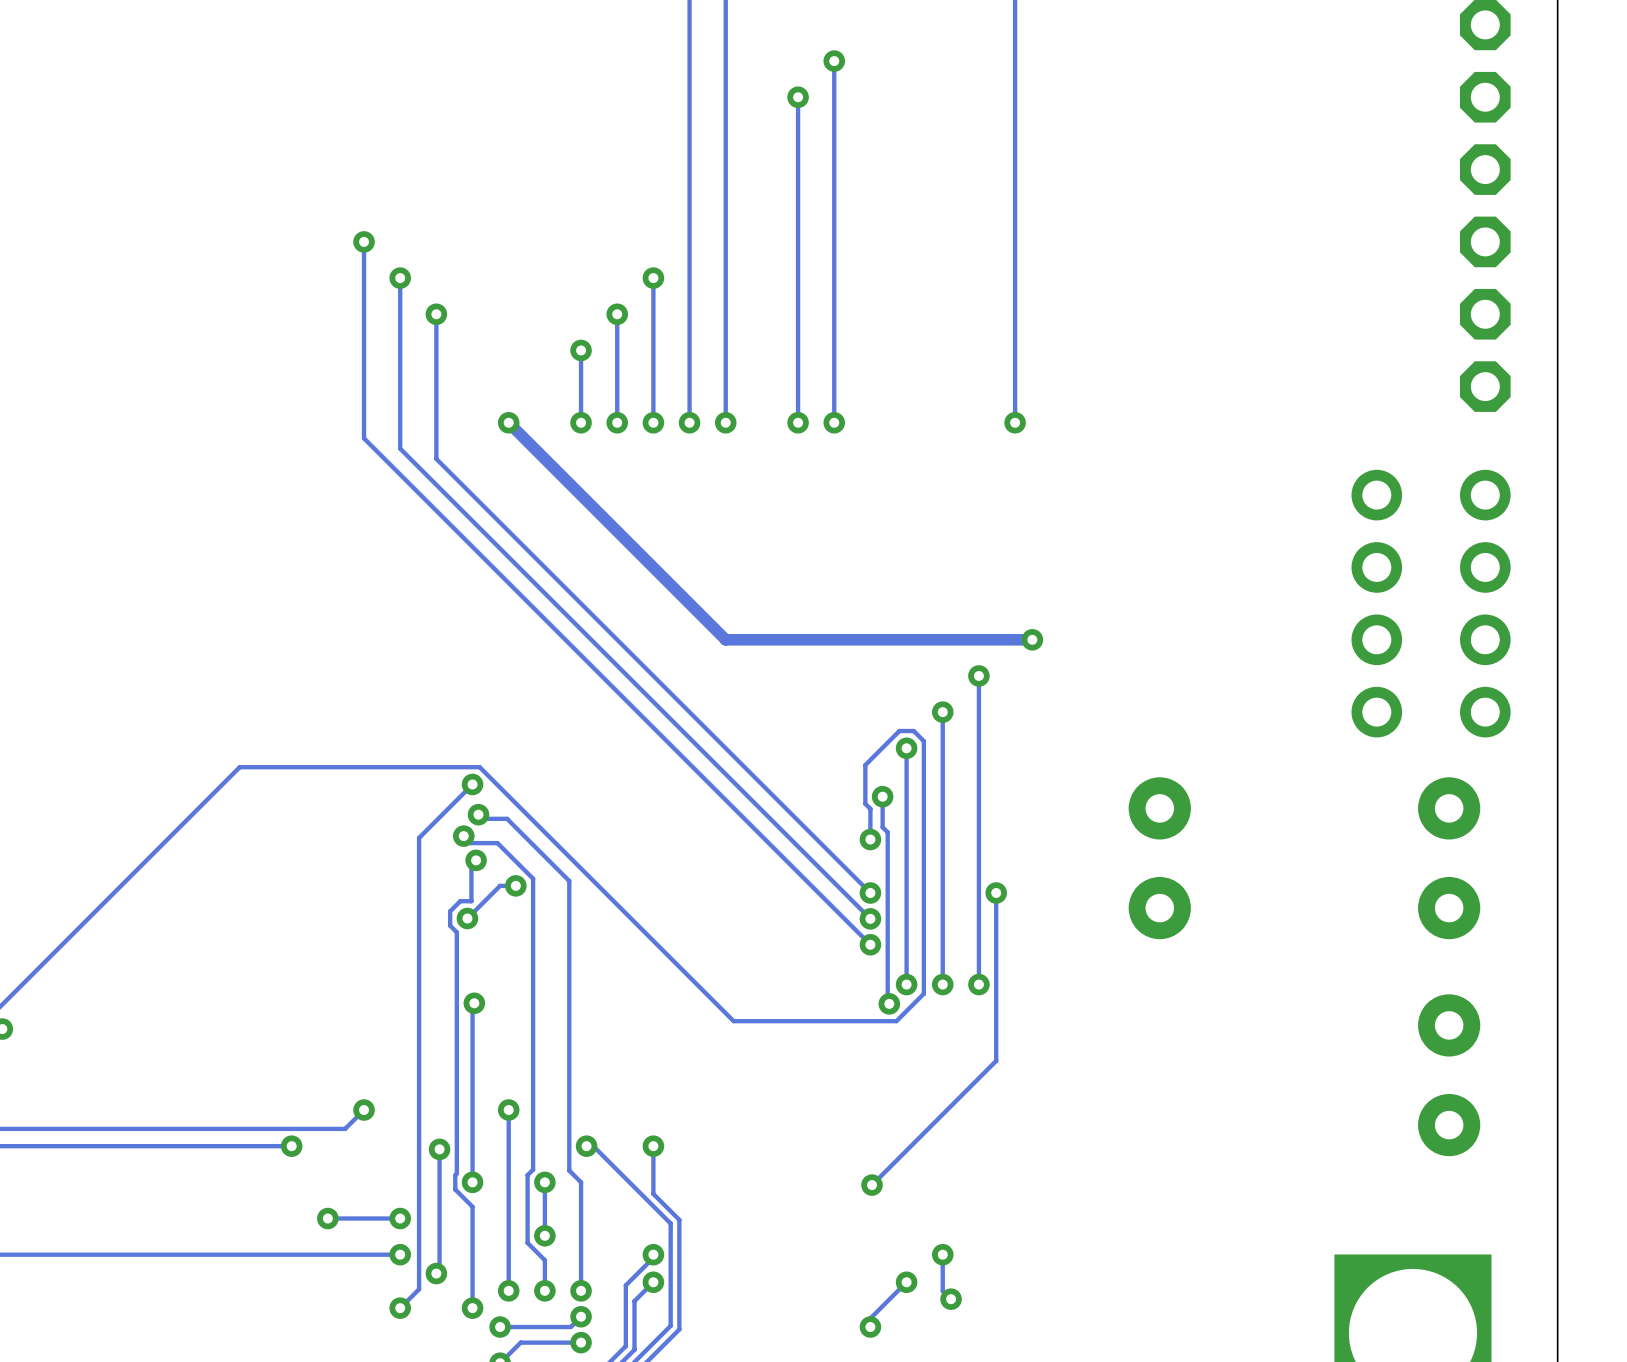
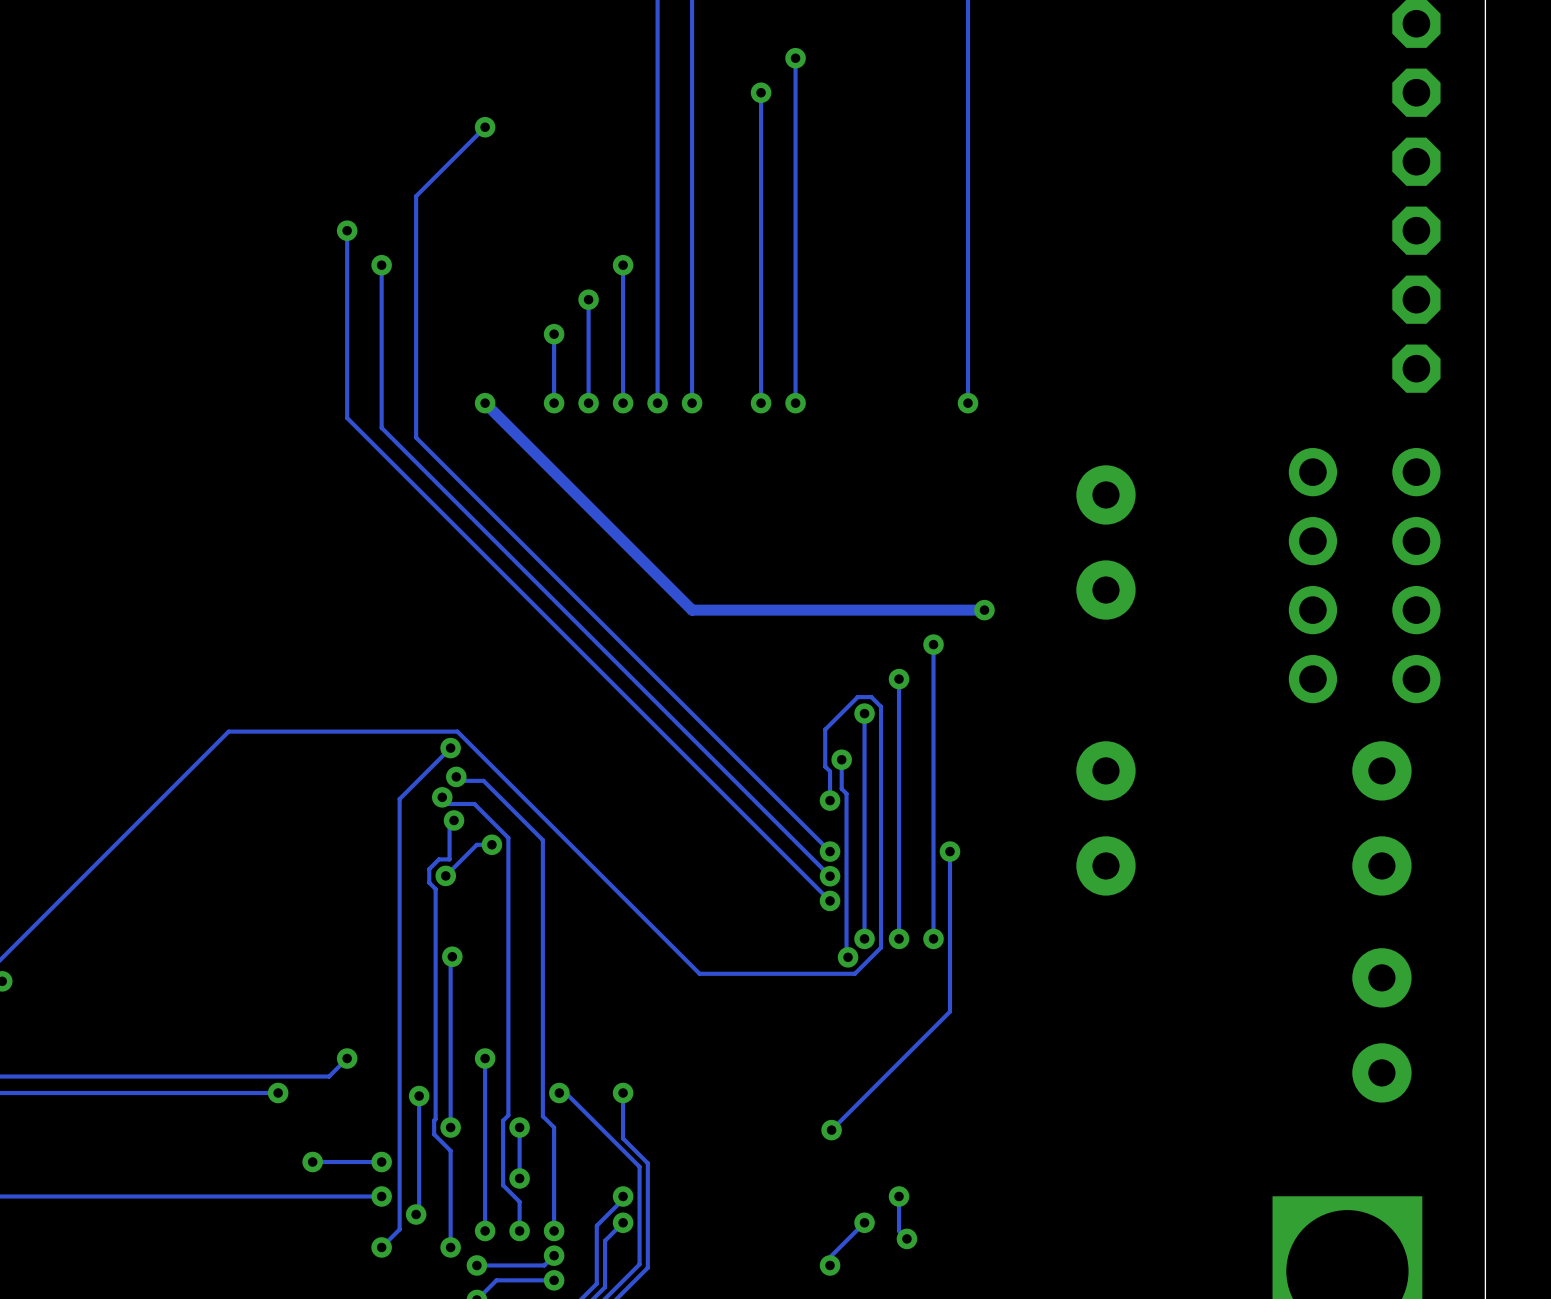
track: none -> (485, 127) (416, 196) (416, 299)
via: none -> (485, 127)
via: (436, 314) -> none
part: none -> (1105, 542)

